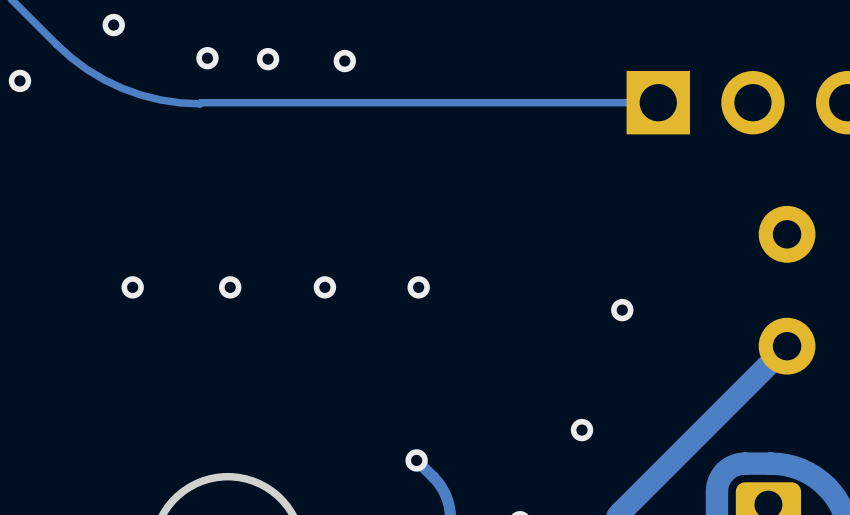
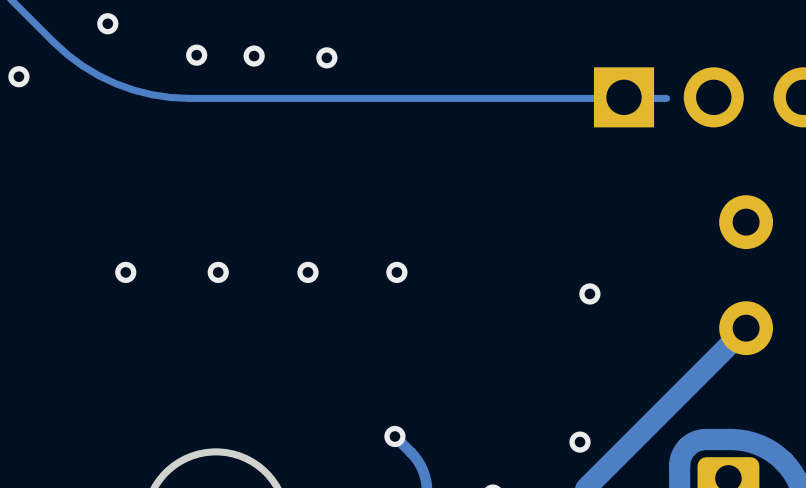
track: (658, 102) (199, 103) -> (666, 98) (189, 98)
via position: (582, 430) -> (580, 442)

